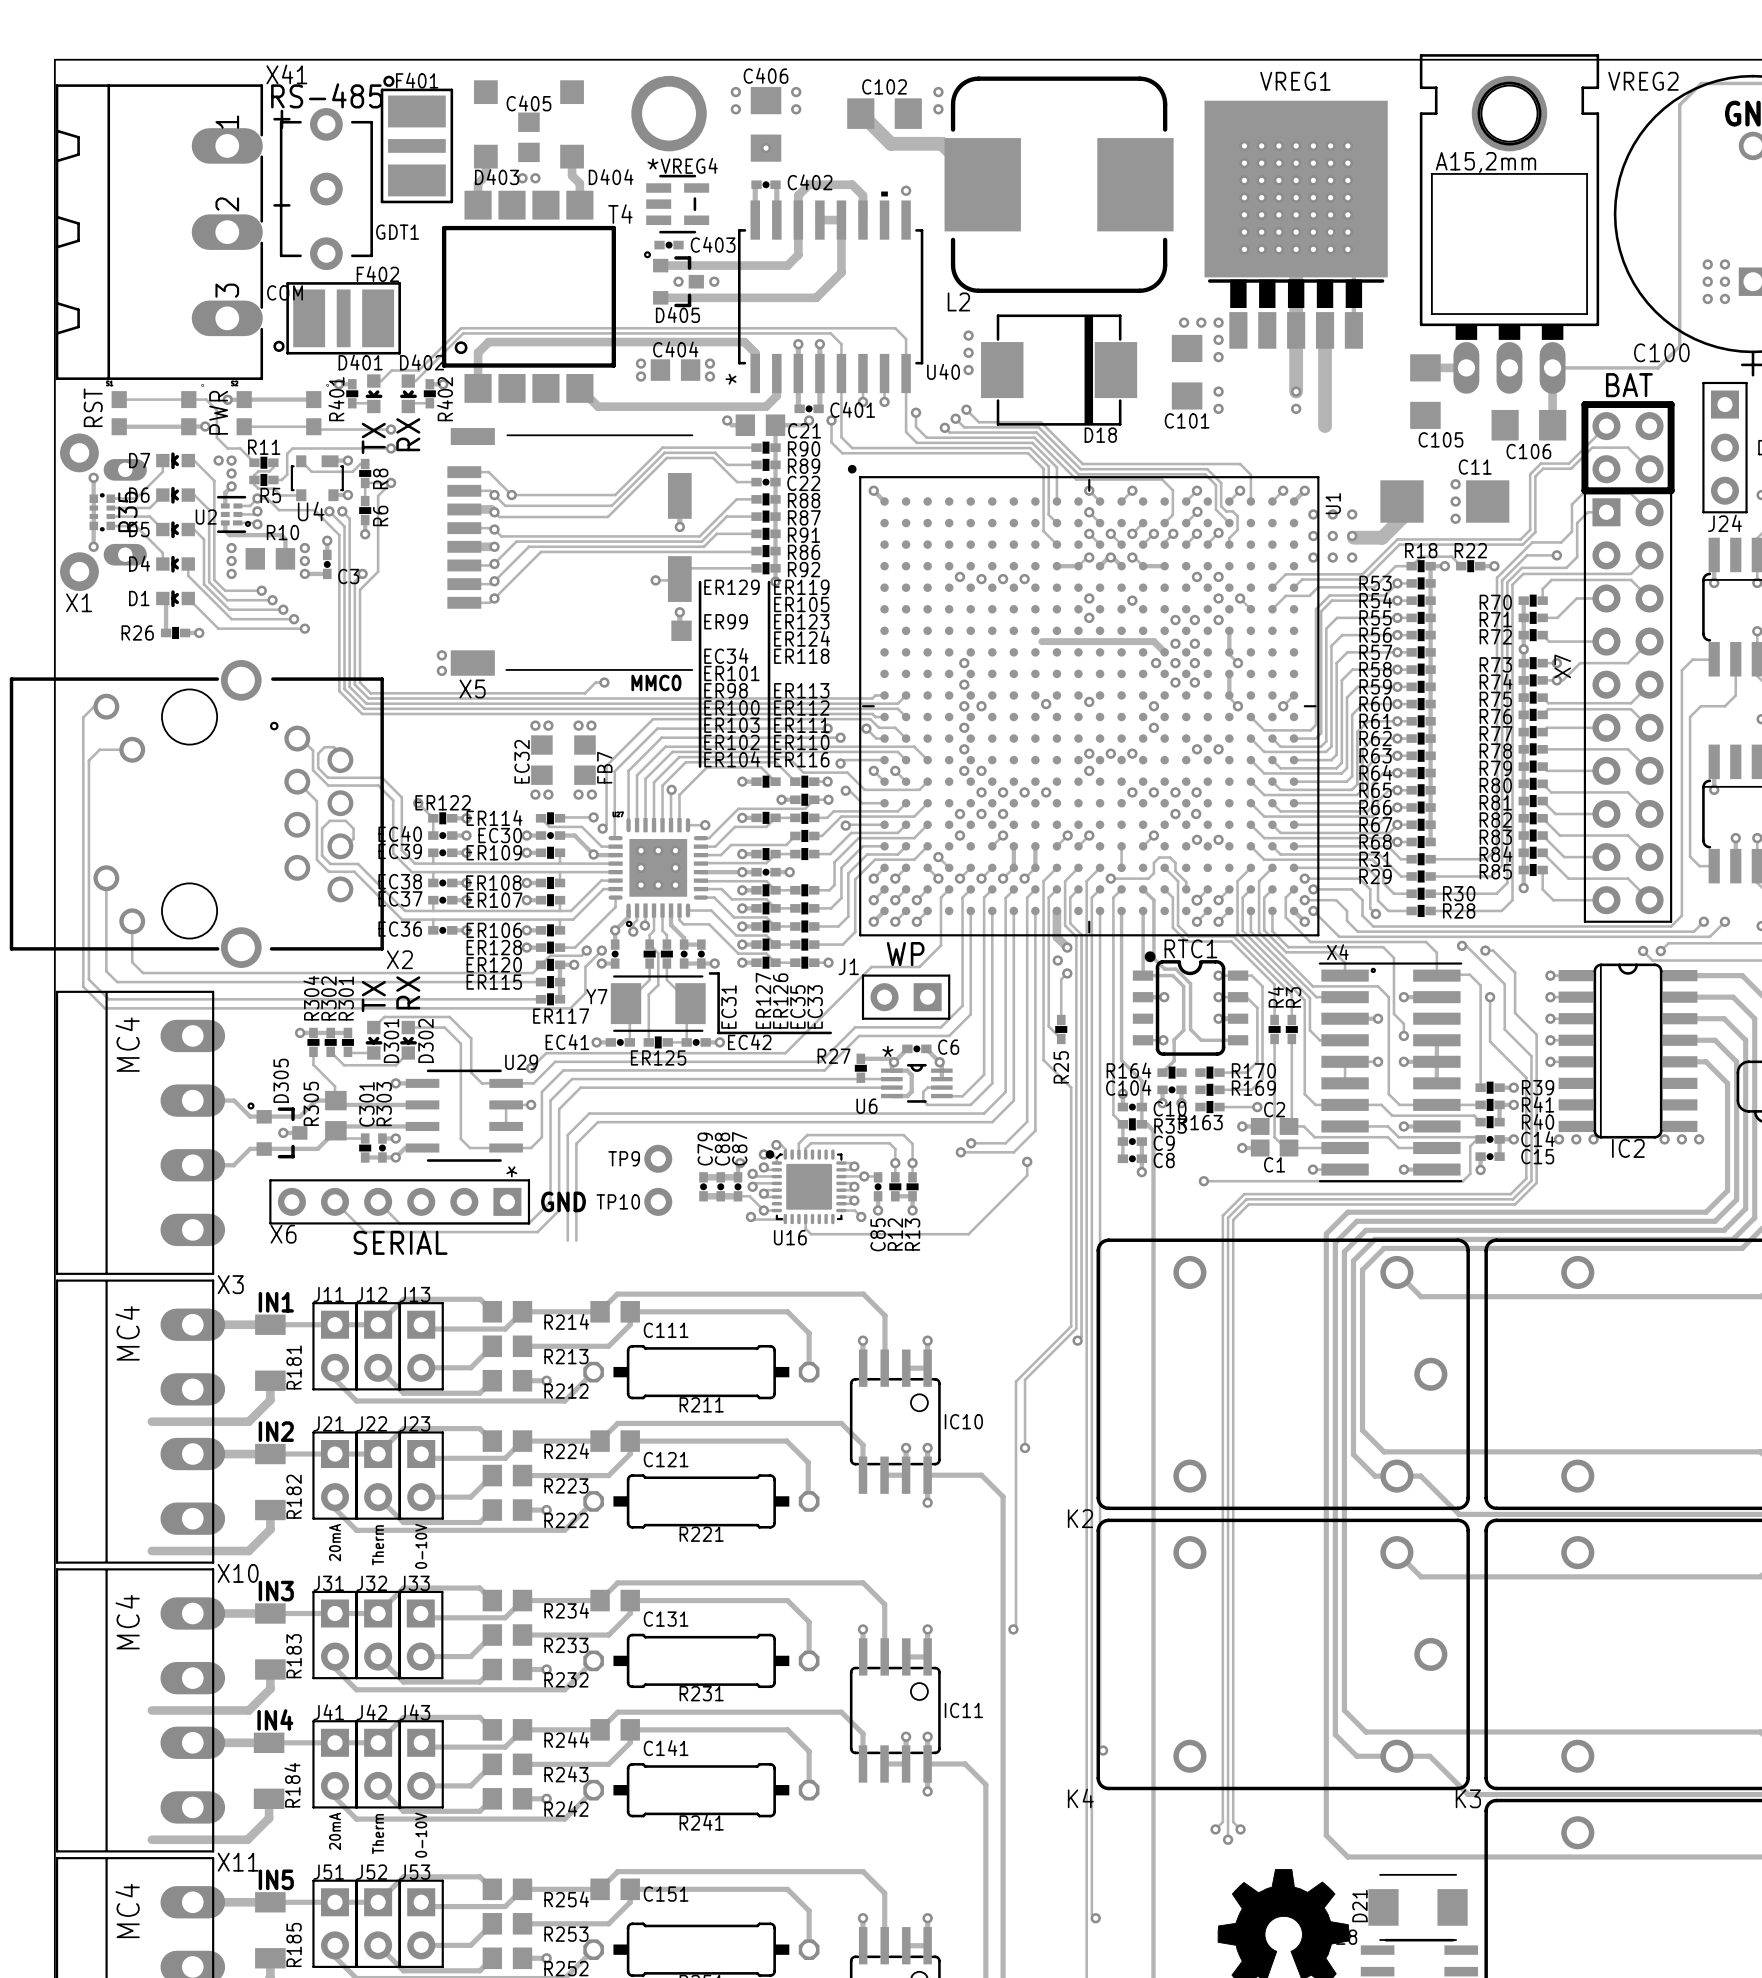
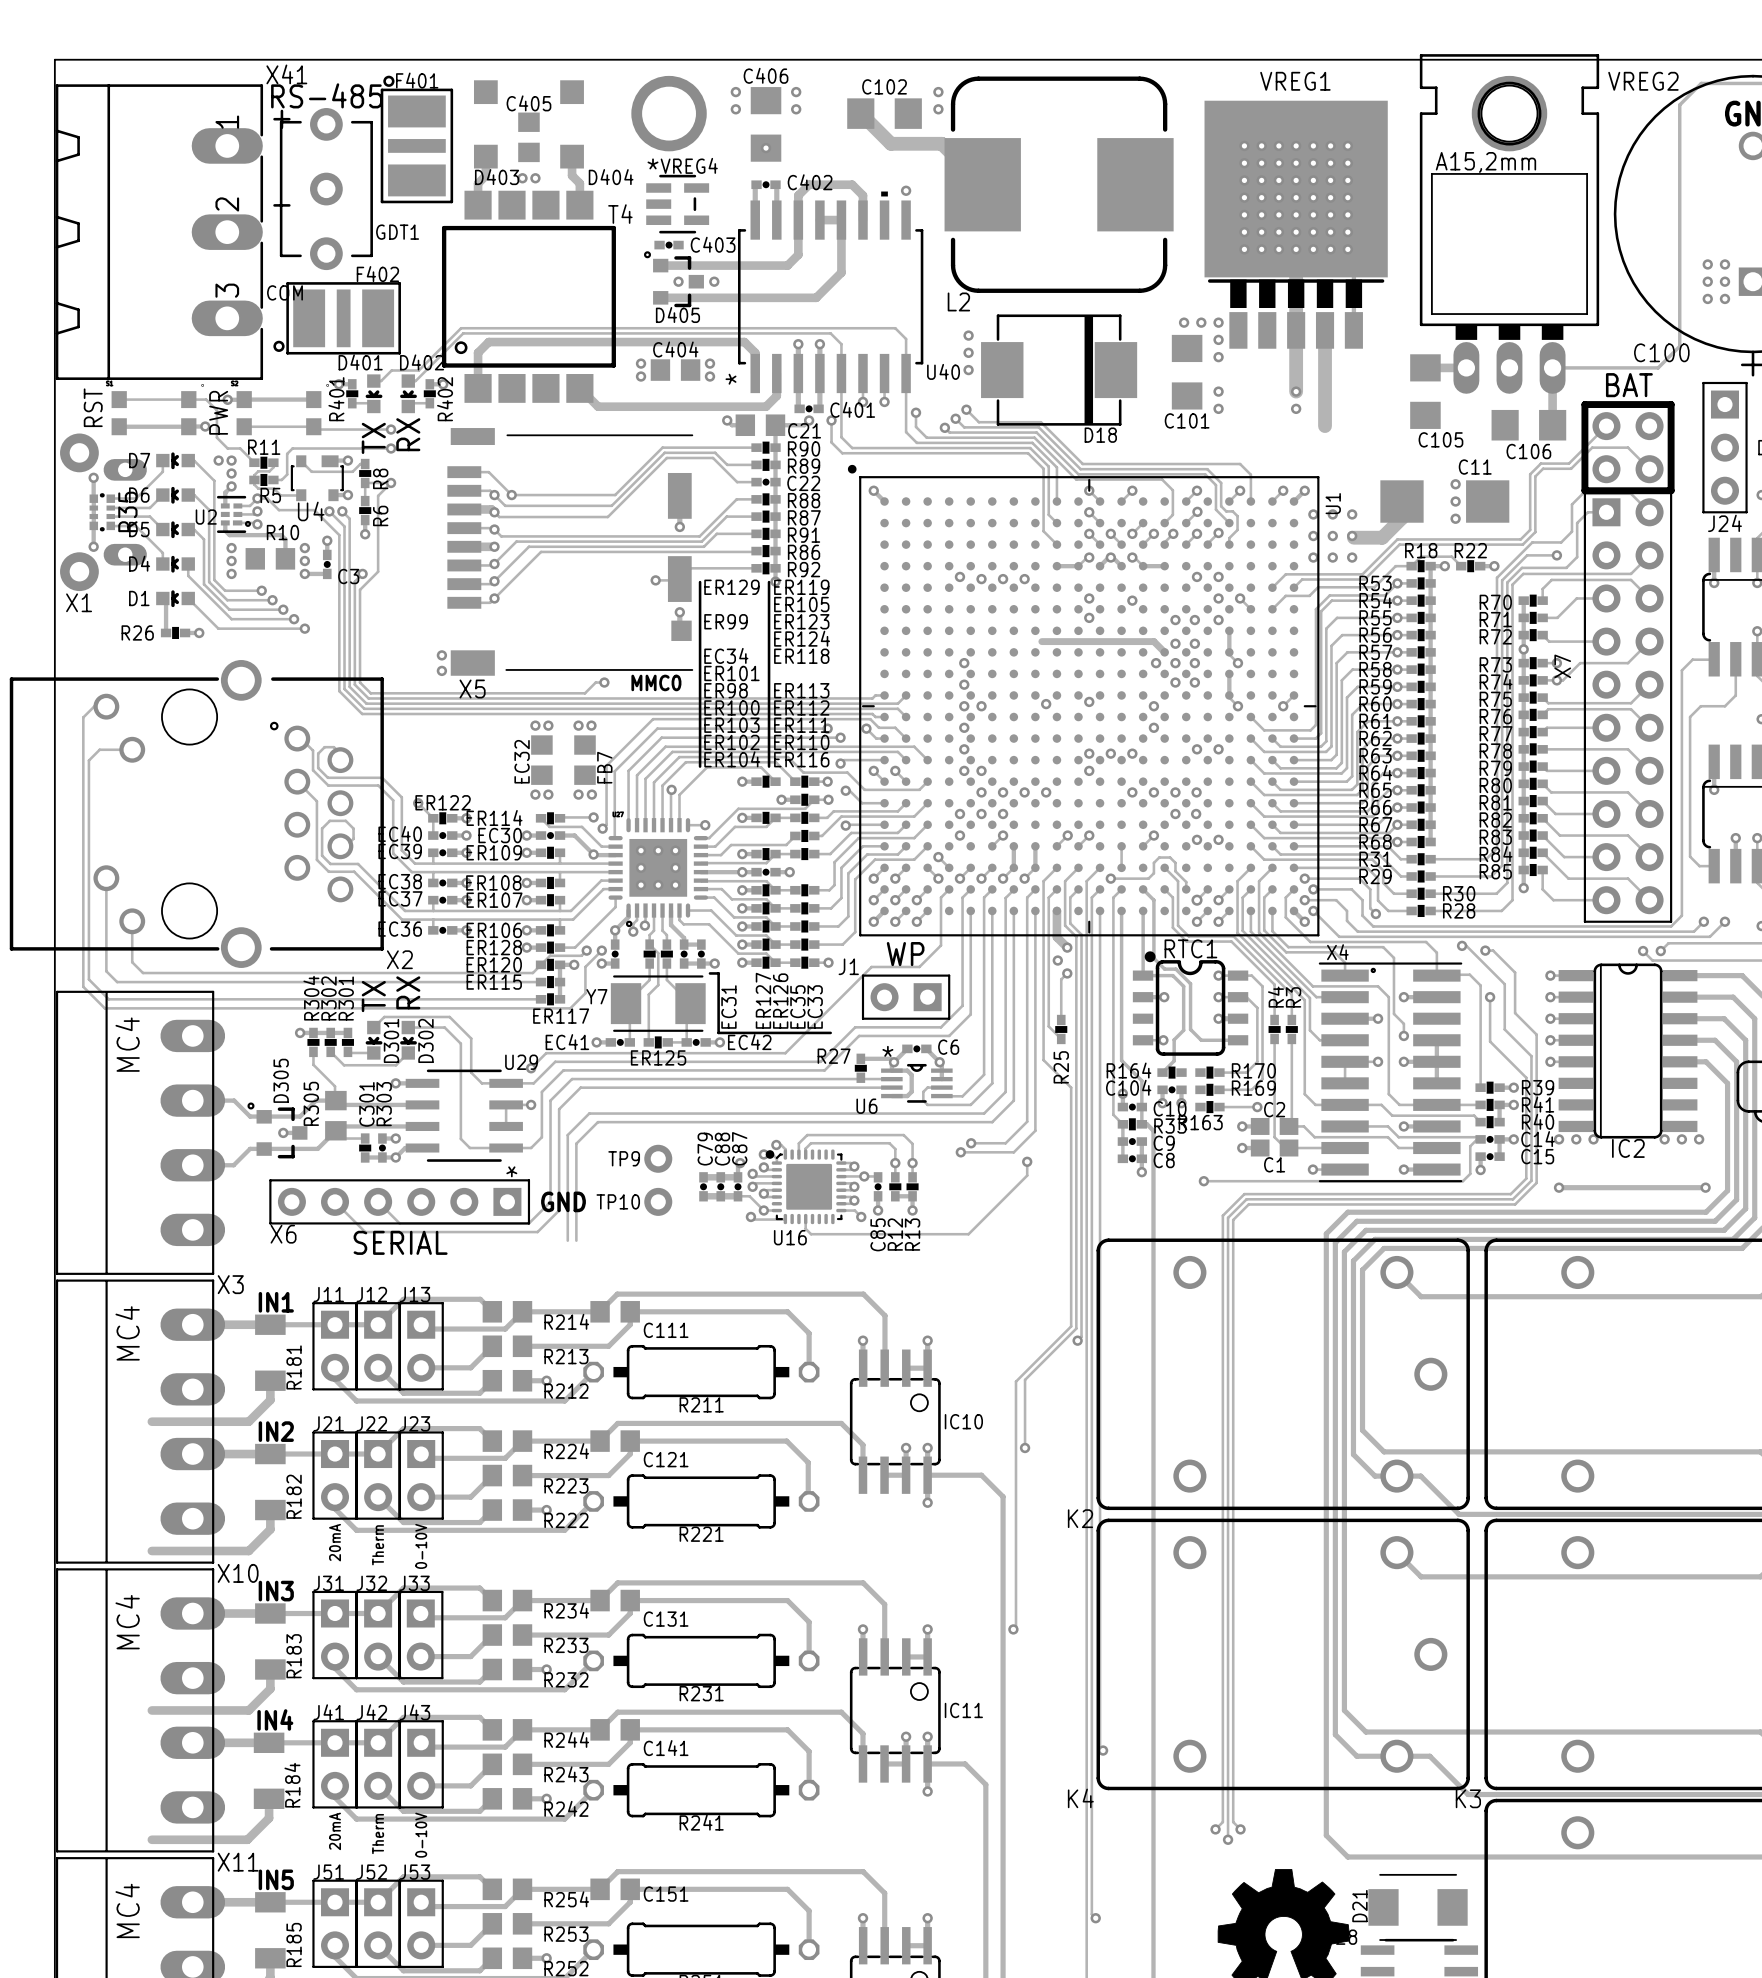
track: none -> (1559, 1187) (1705, 1187)
via: none -> (1559, 1187)
via: none -> (1705, 1187)

